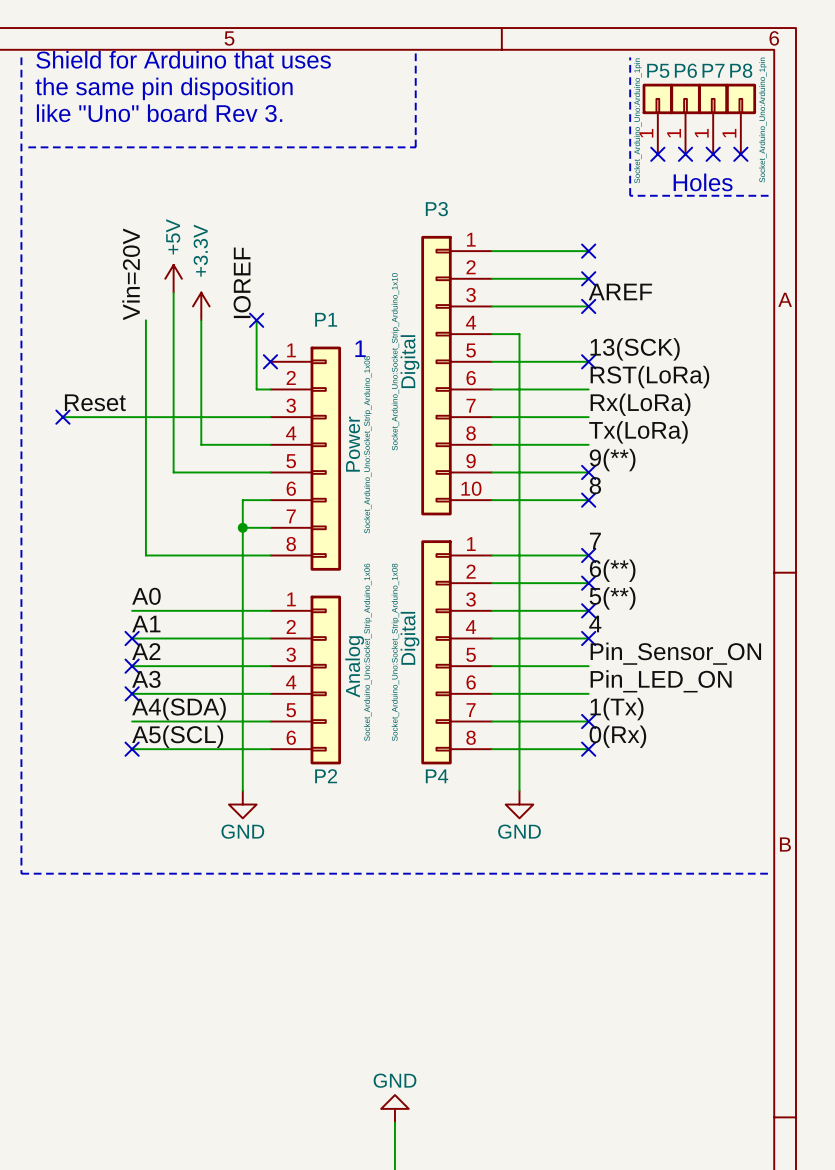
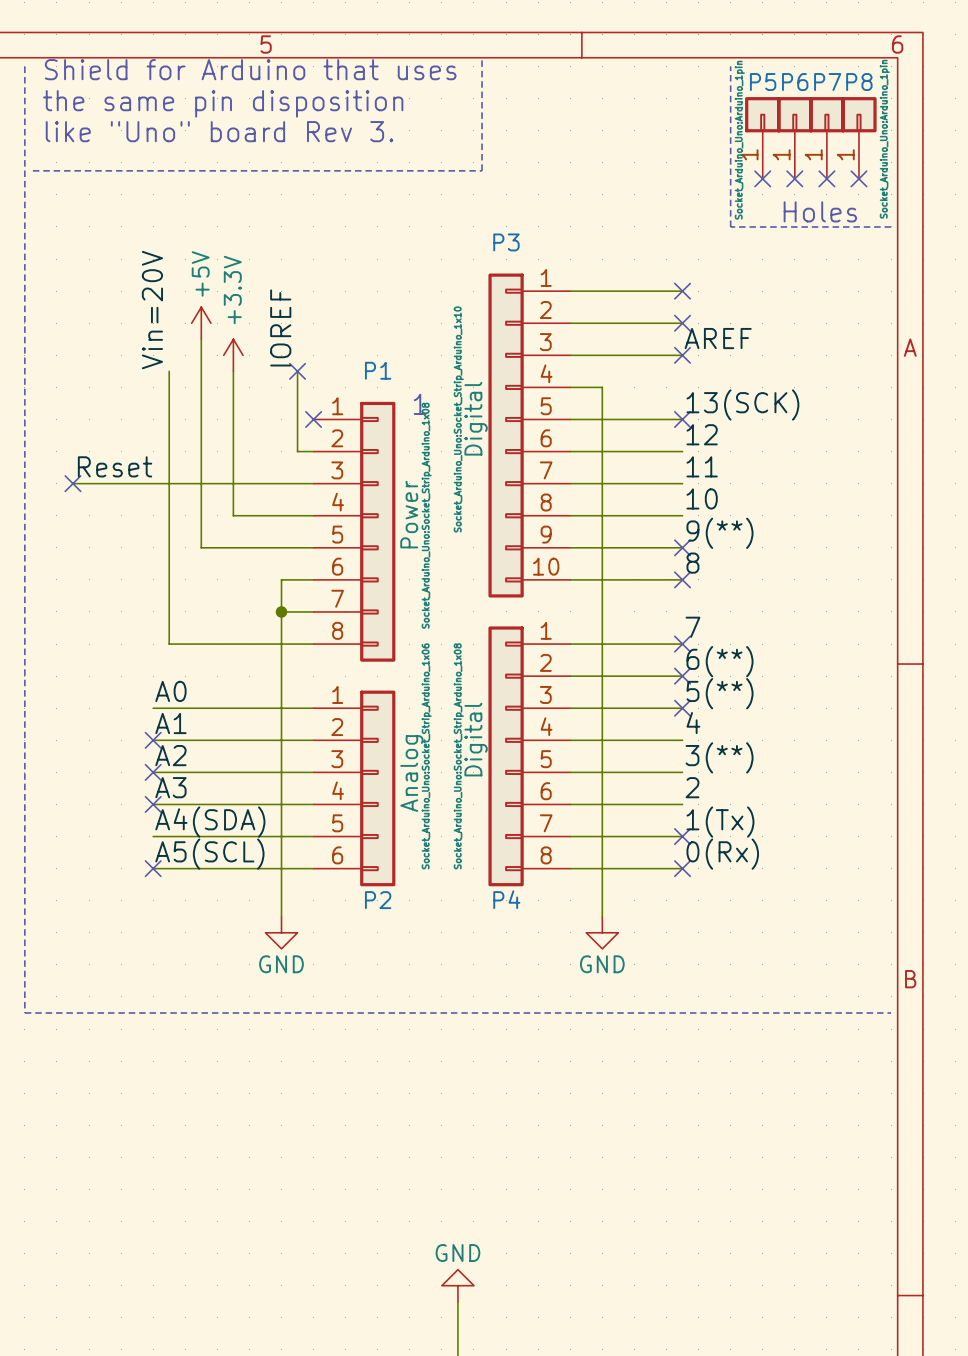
label: RST(LoRa) (649, 377) -> 12 (702, 434)
label: Rx(LoRa) (640, 404) -> 11 (702, 466)
label: Tx(LoRa) (638, 432) -> 10 (702, 498)
no-connect mark: (588, 638) -> none
label: Pin_Sensor_ON (675, 653) -> 3(**) (719, 757)
label: Pin_LED_ON (661, 681) -> 2 (692, 787)

